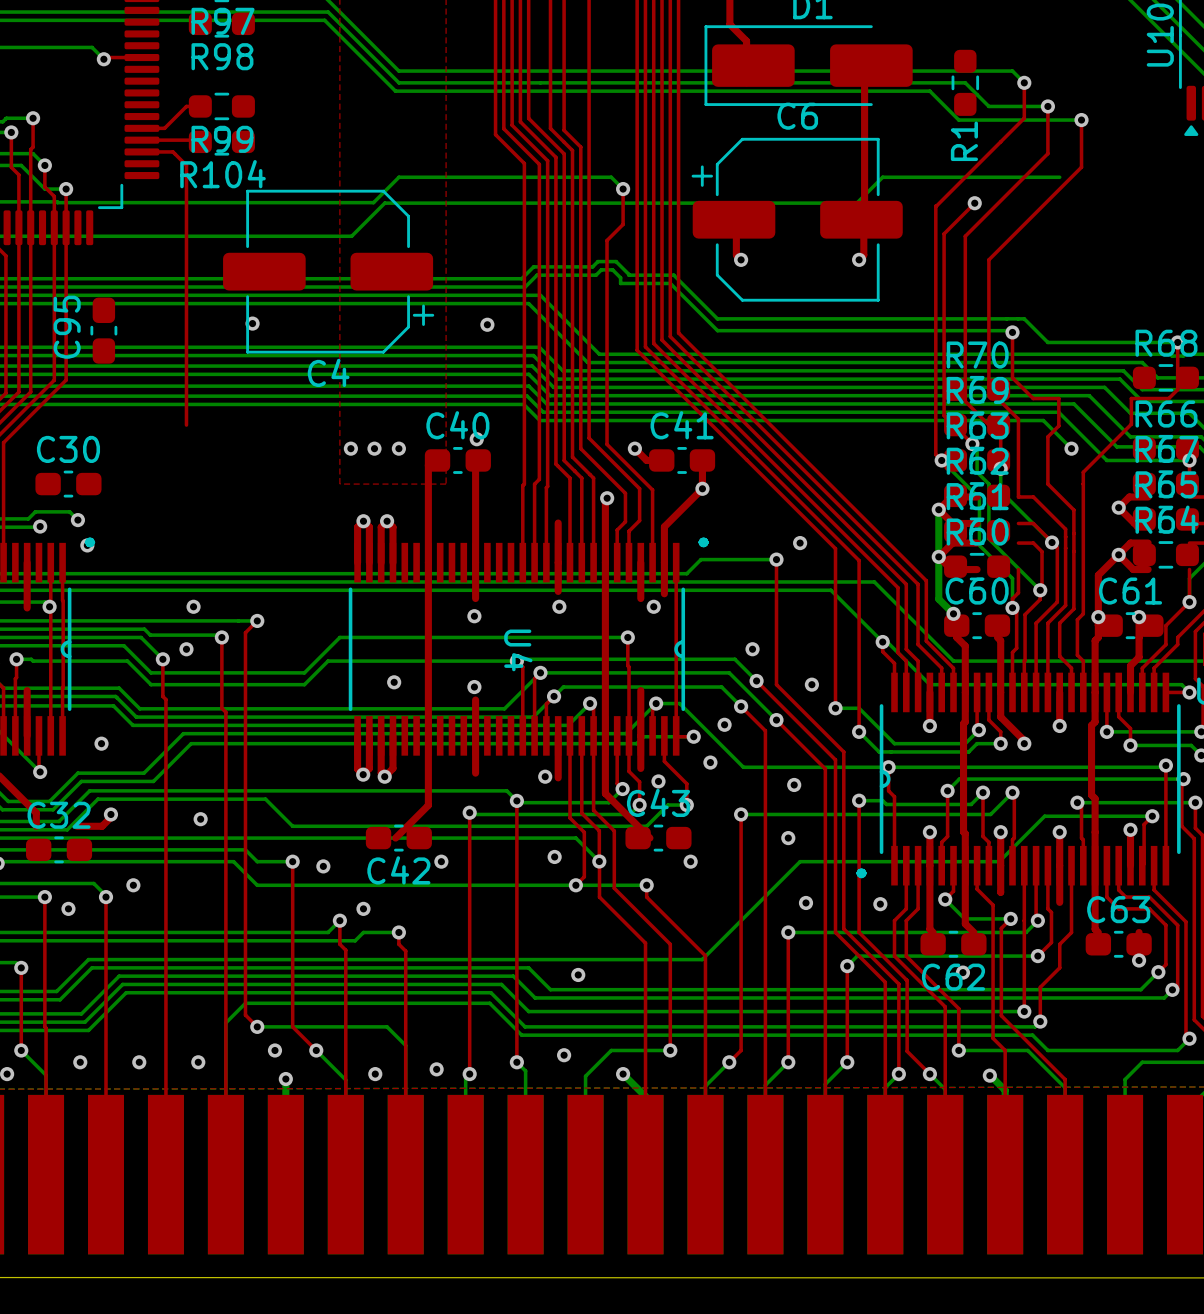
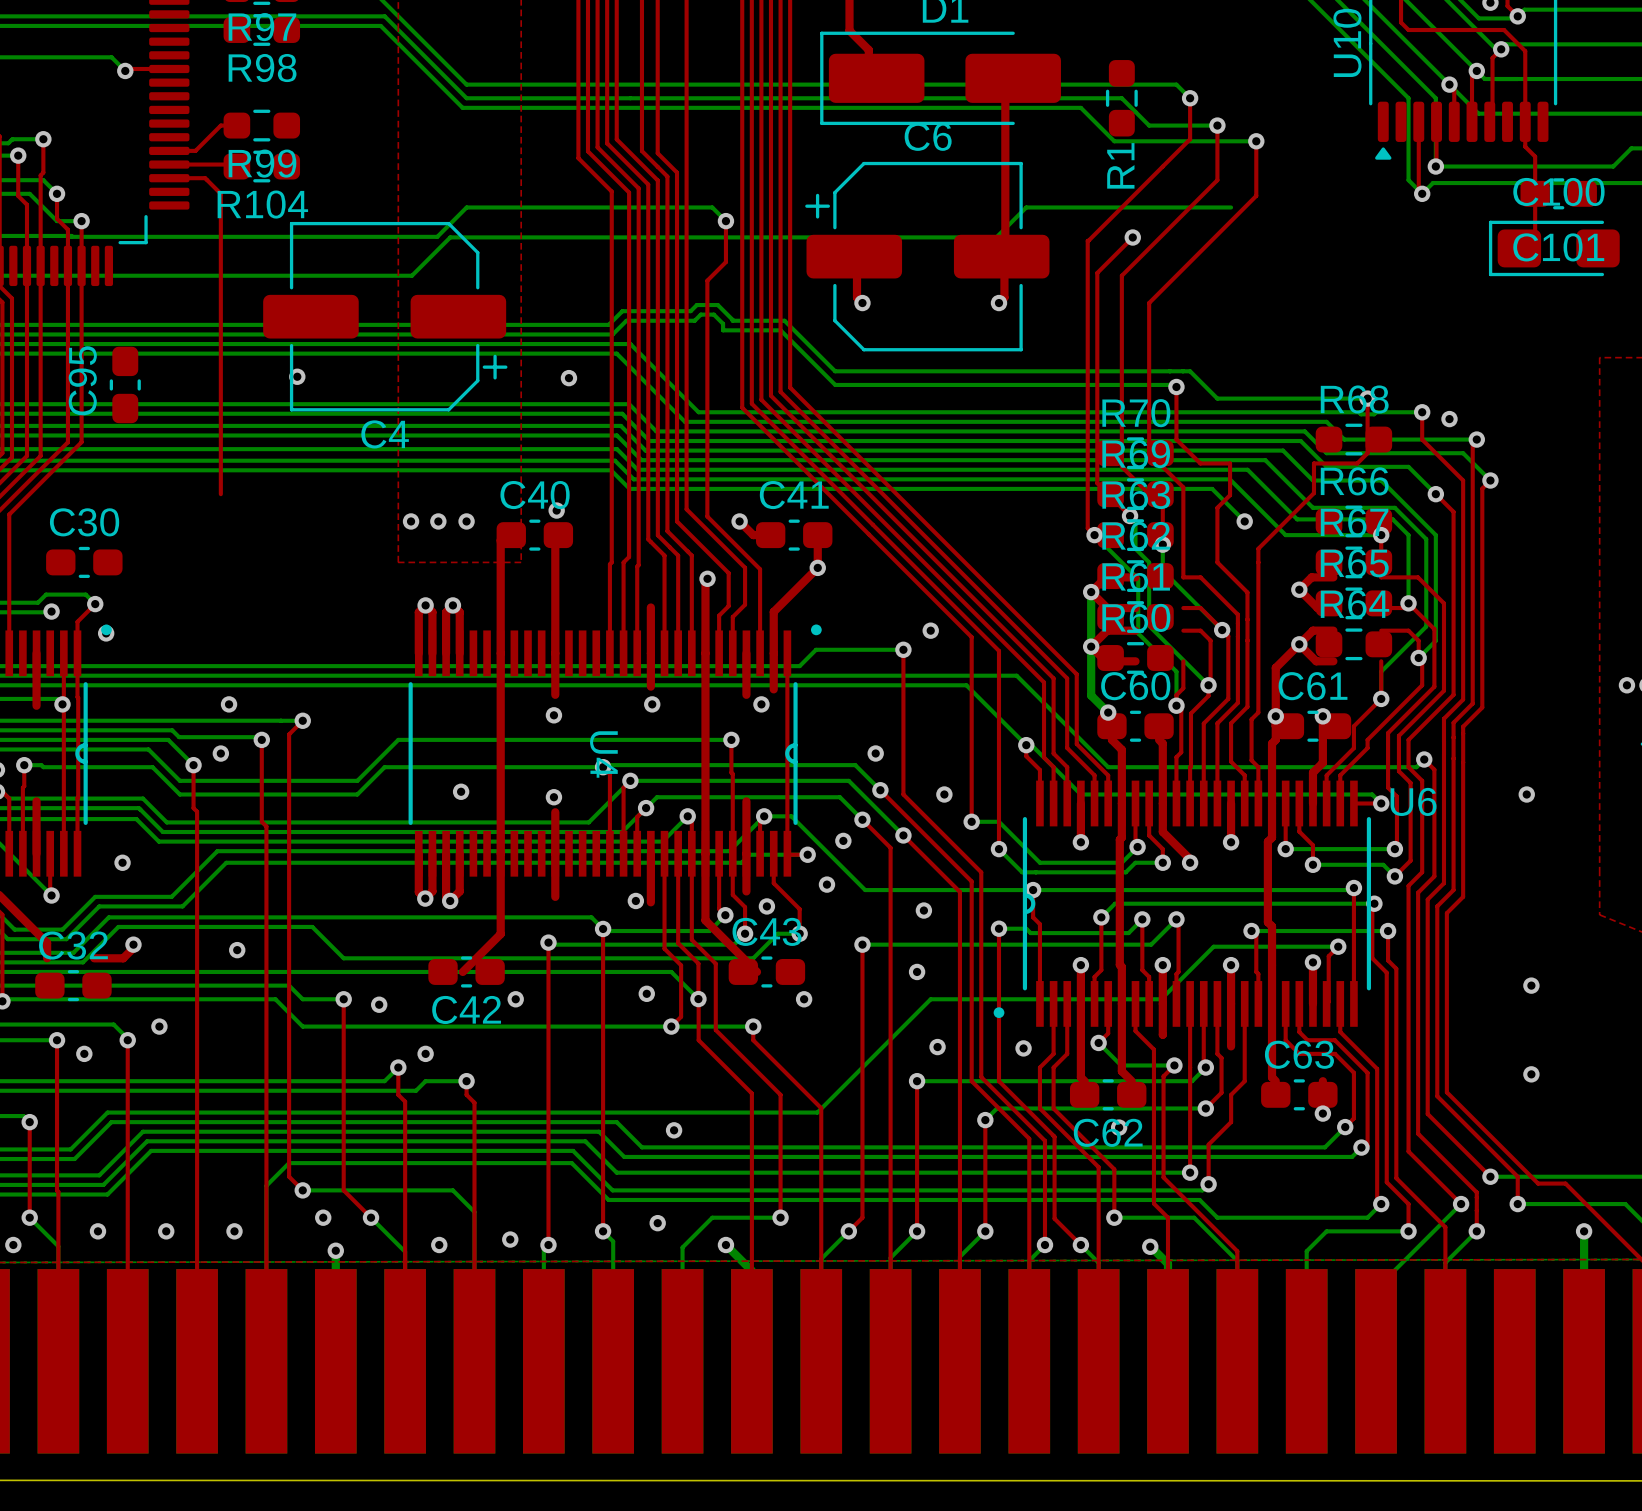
top track: none -> (95, 604) (77, 621) (77, 653)

